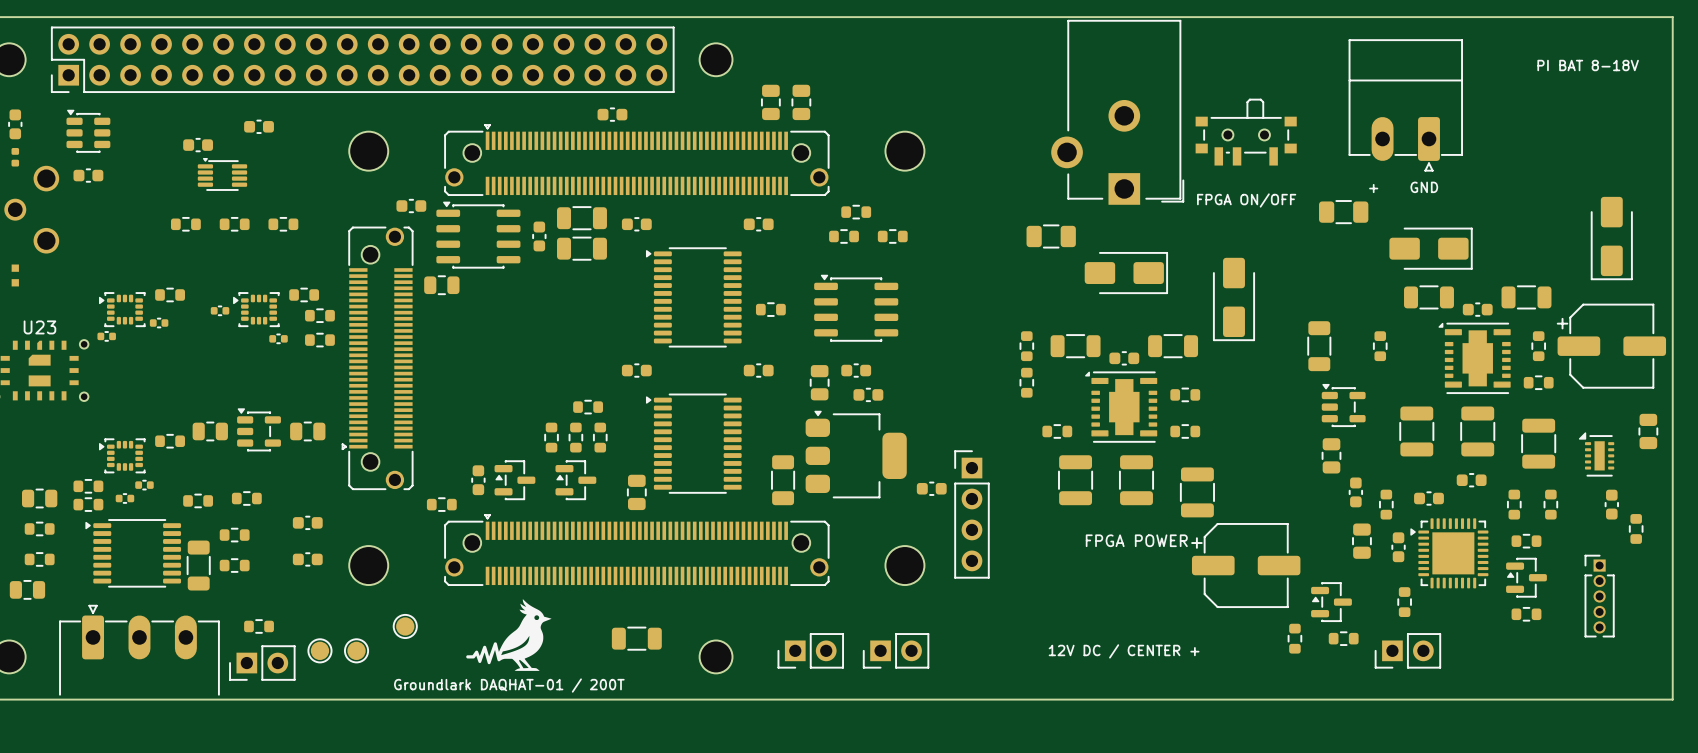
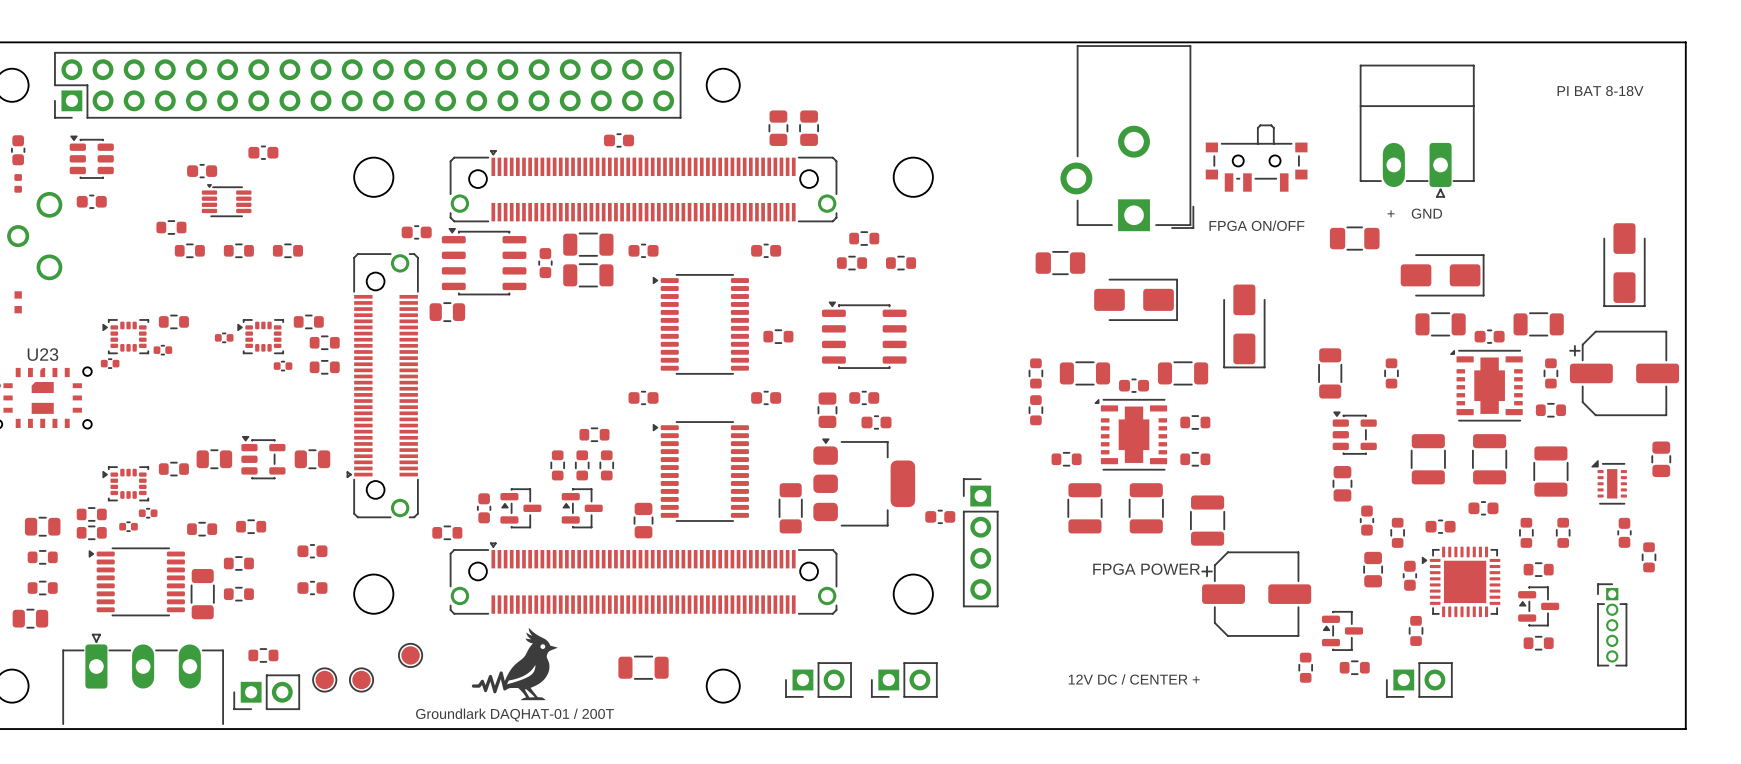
part: none -> (171, 227)

